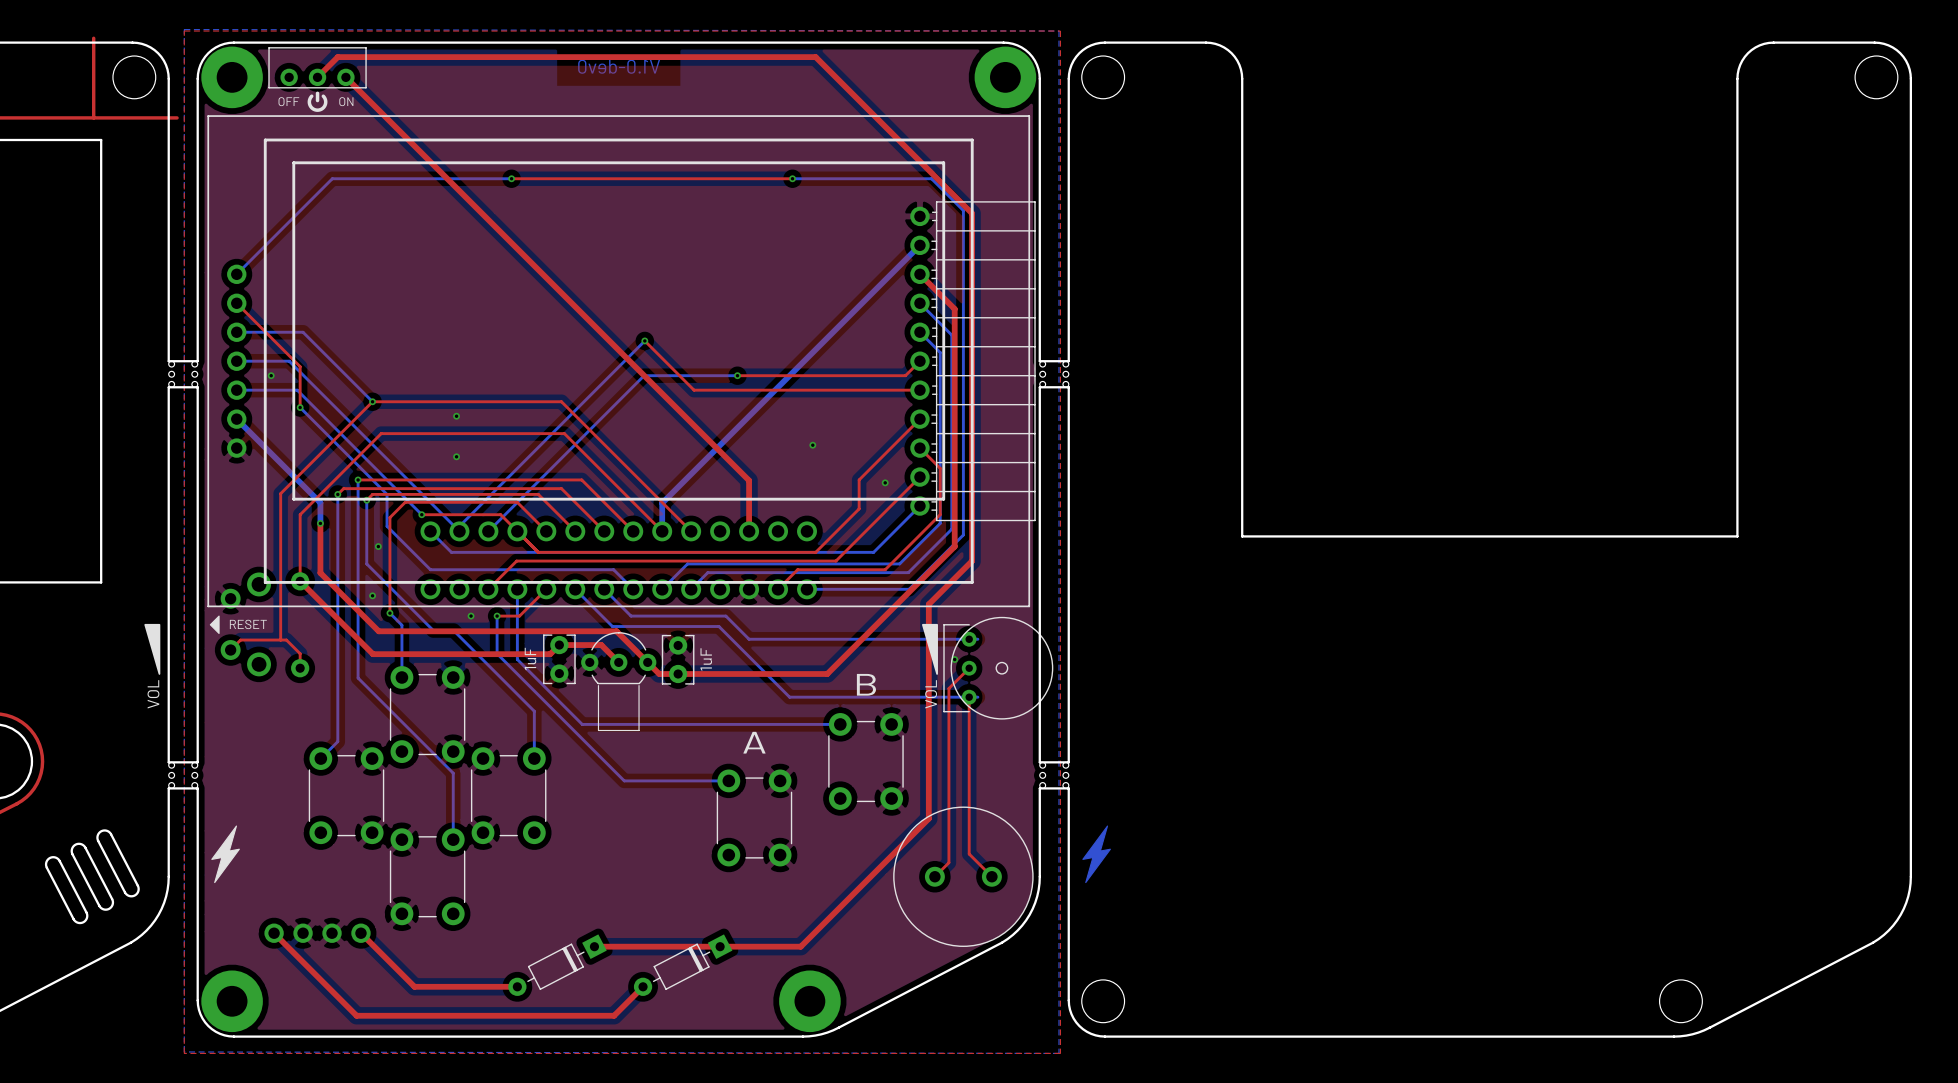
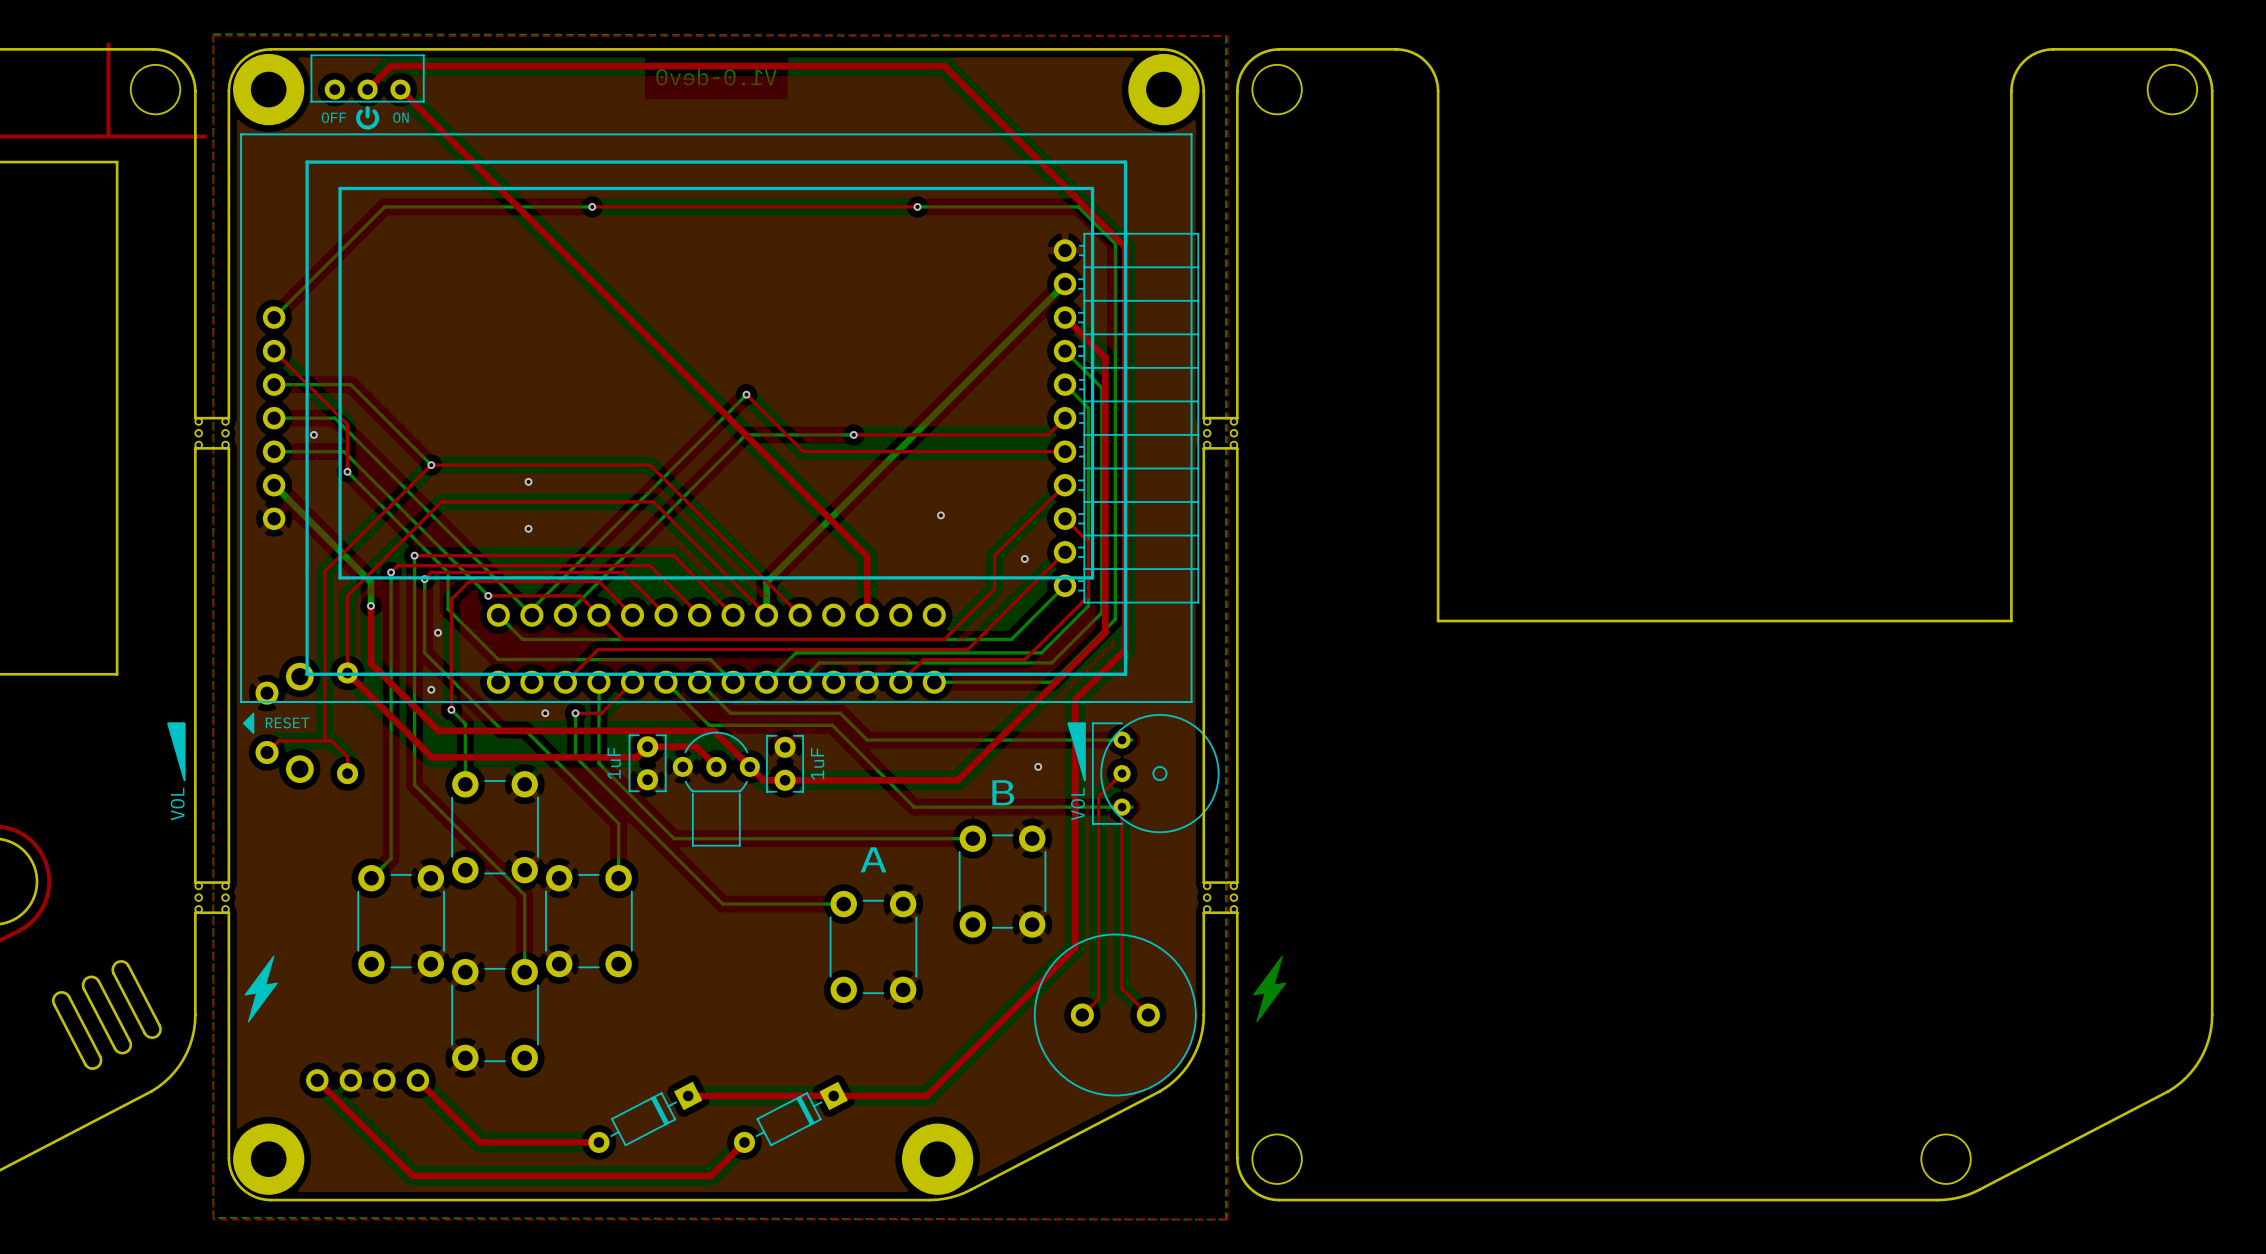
via position: (954, 659) -> (1038, 766)

